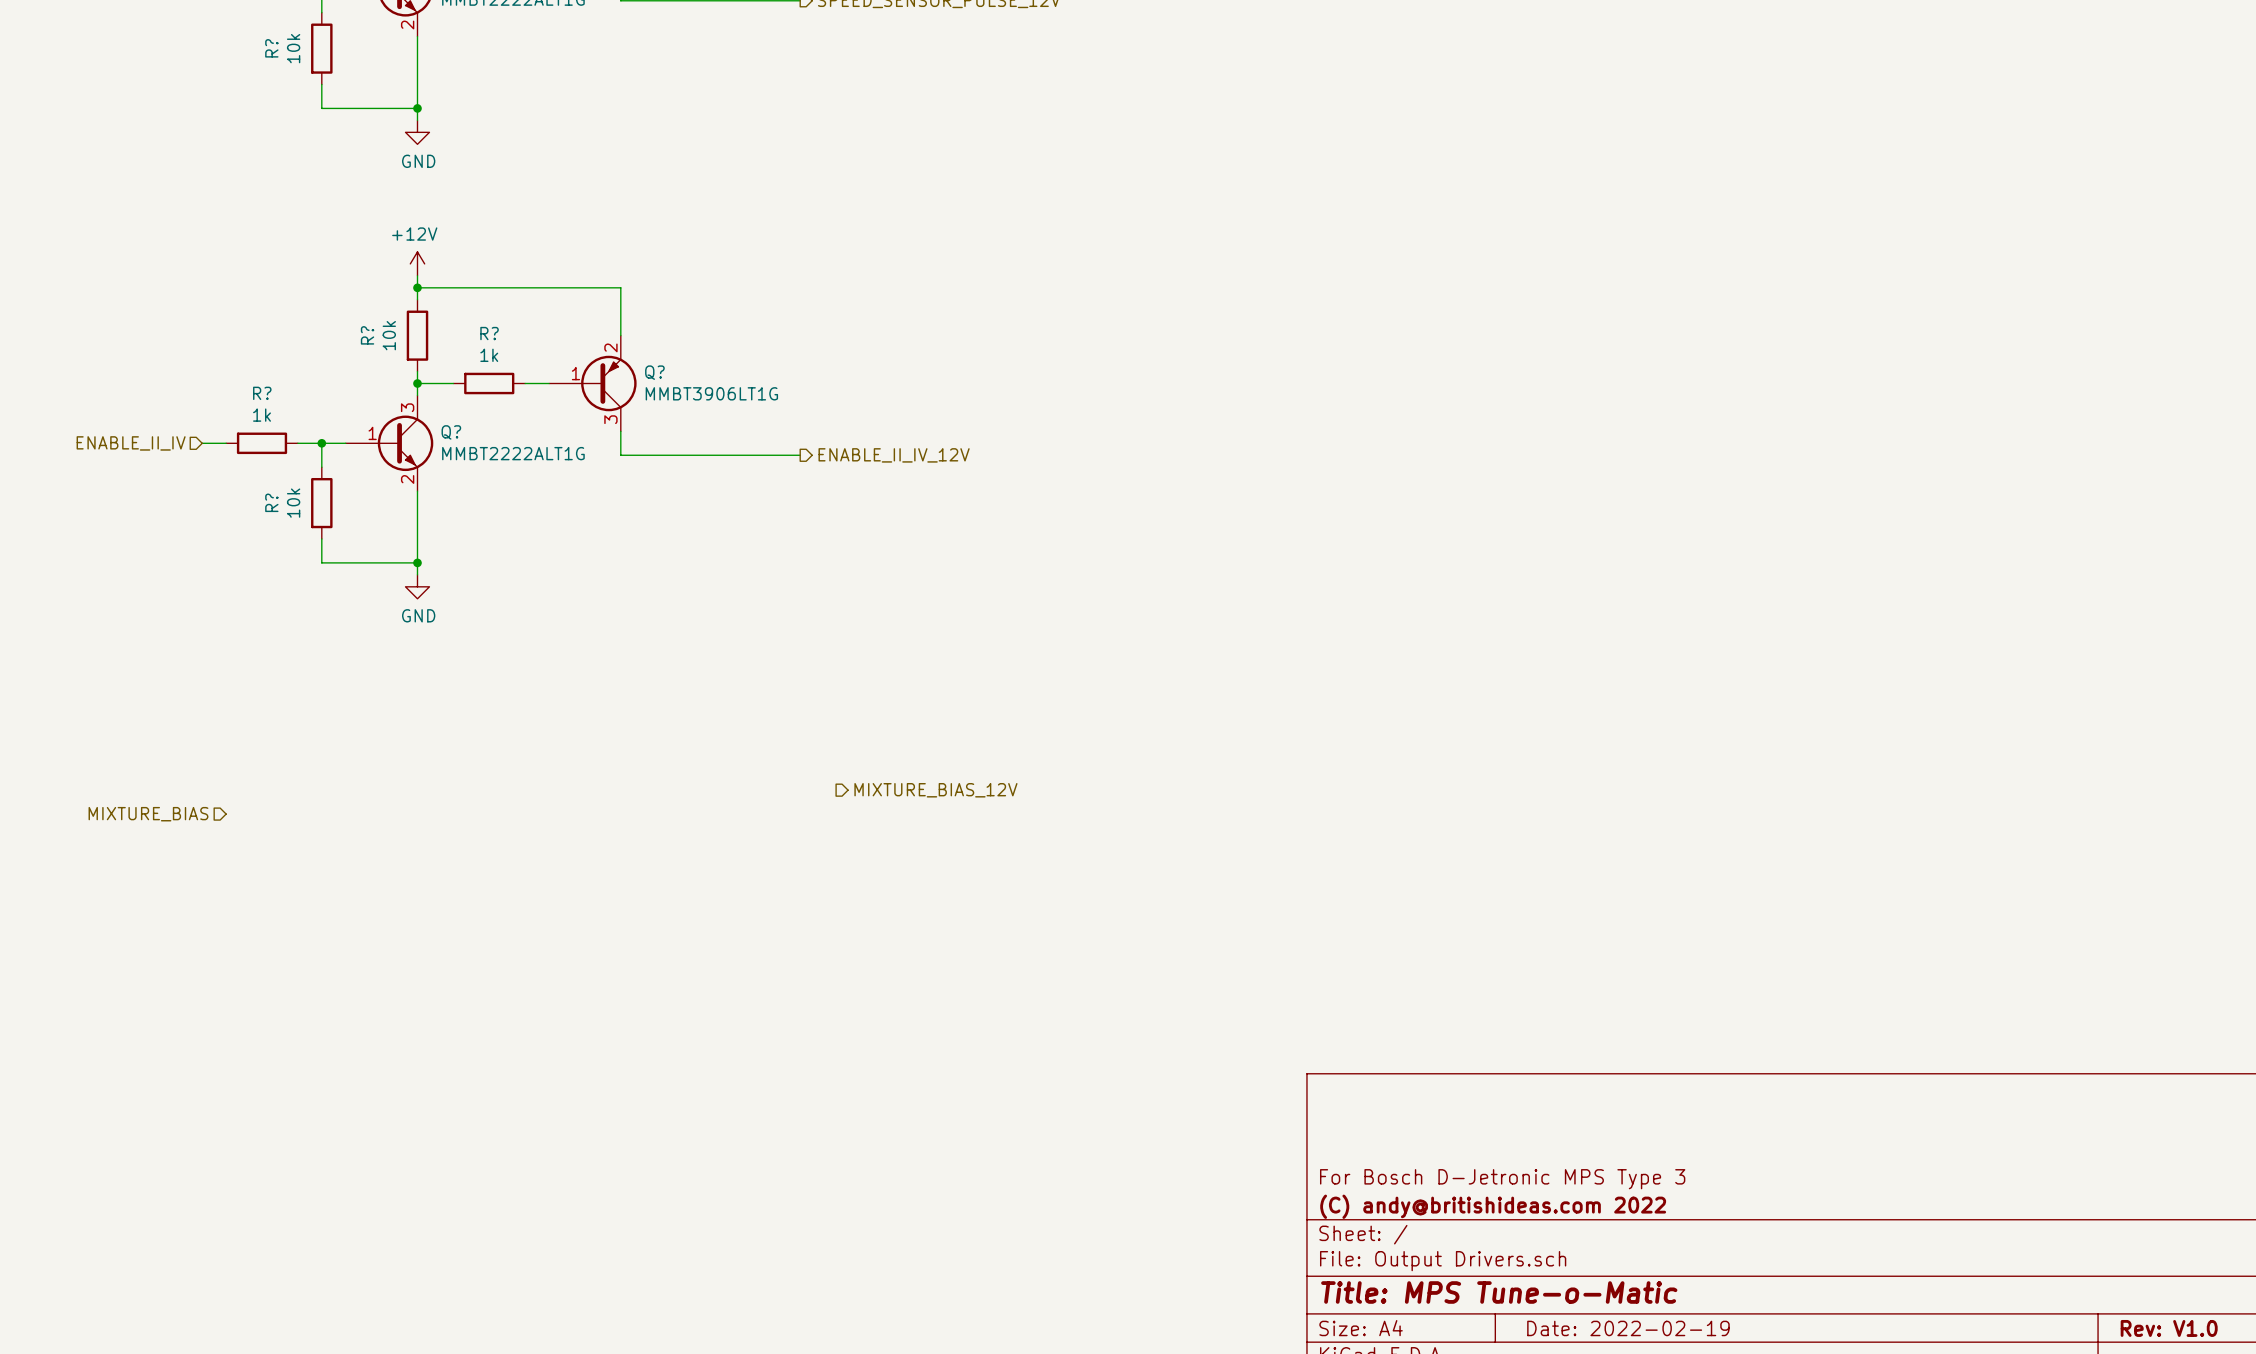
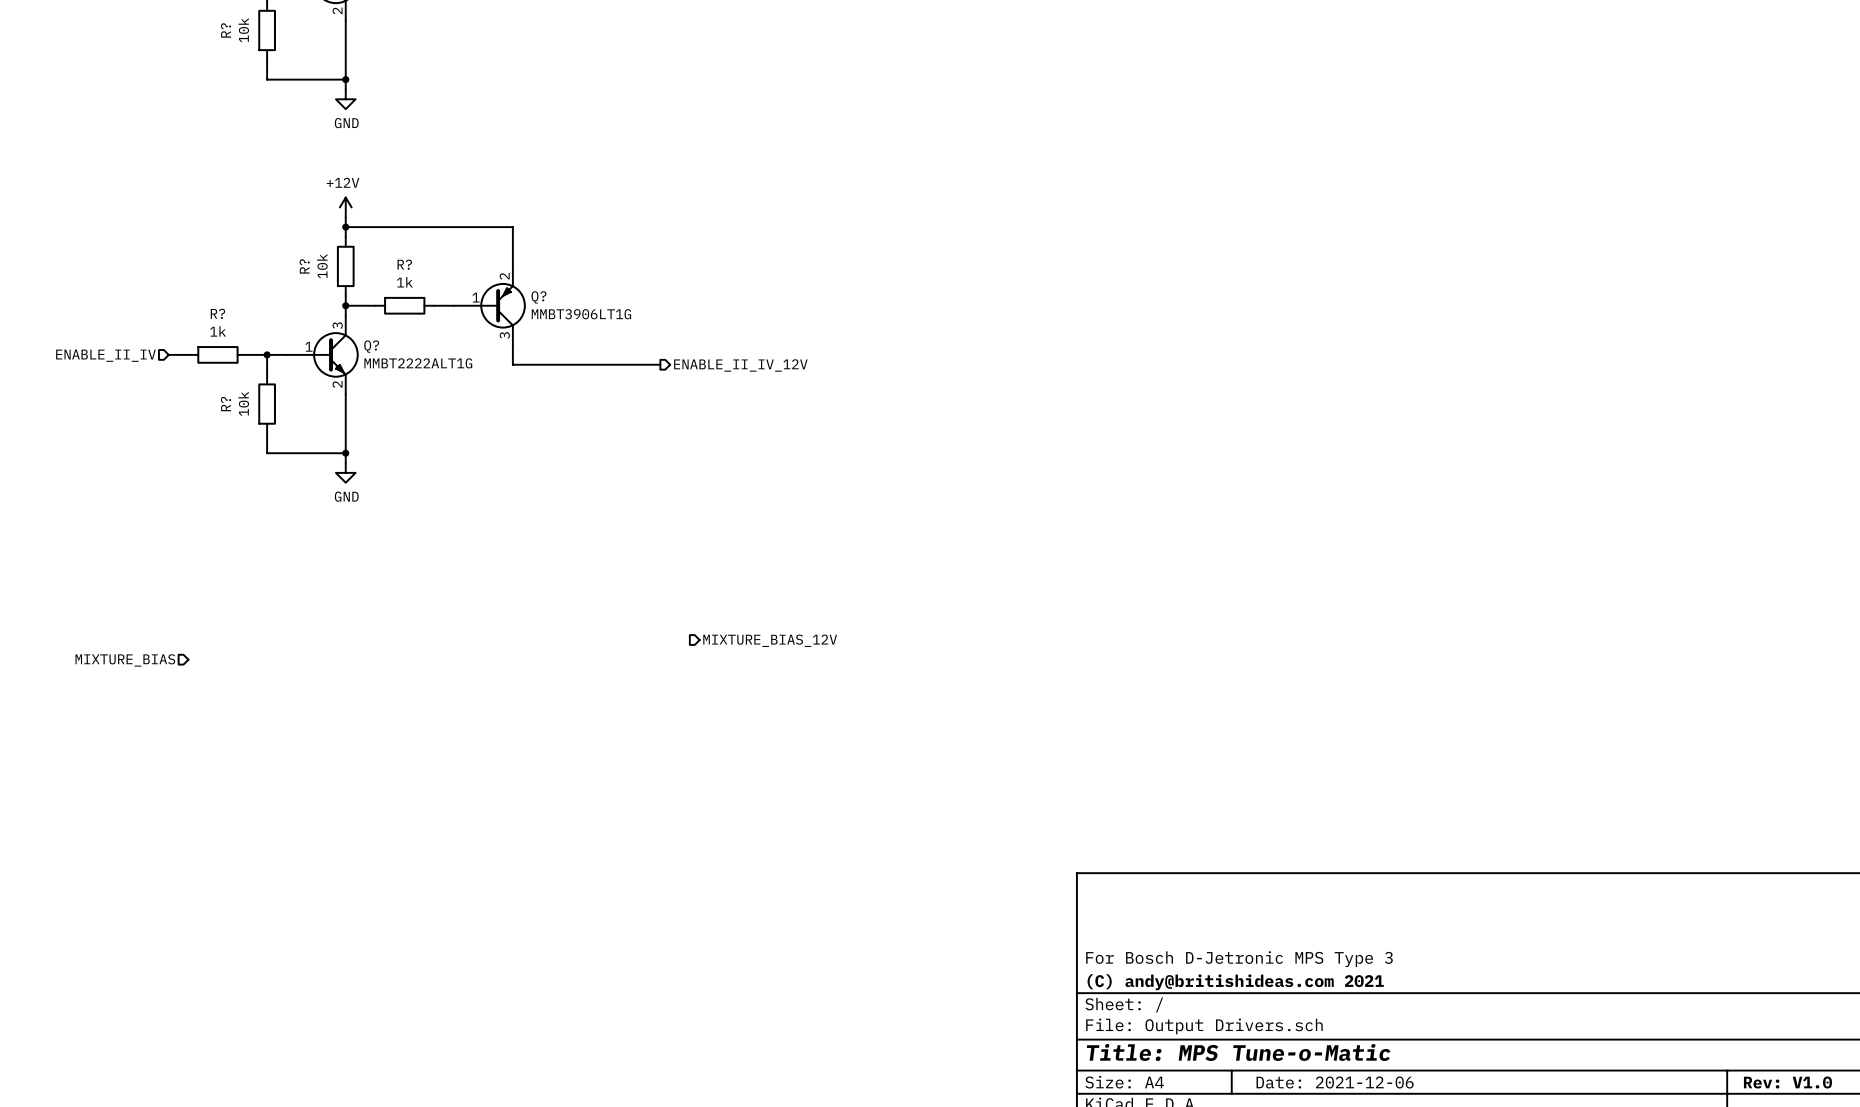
title block: (C) andy@britishideas.com 2022 (1493, 1206) -> (C) andy@britishideas.com 2021 (1235, 982)
title block: Date: 2022-02-19 (1628, 1328) -> Date: 2021-12-06 (1335, 1082)

